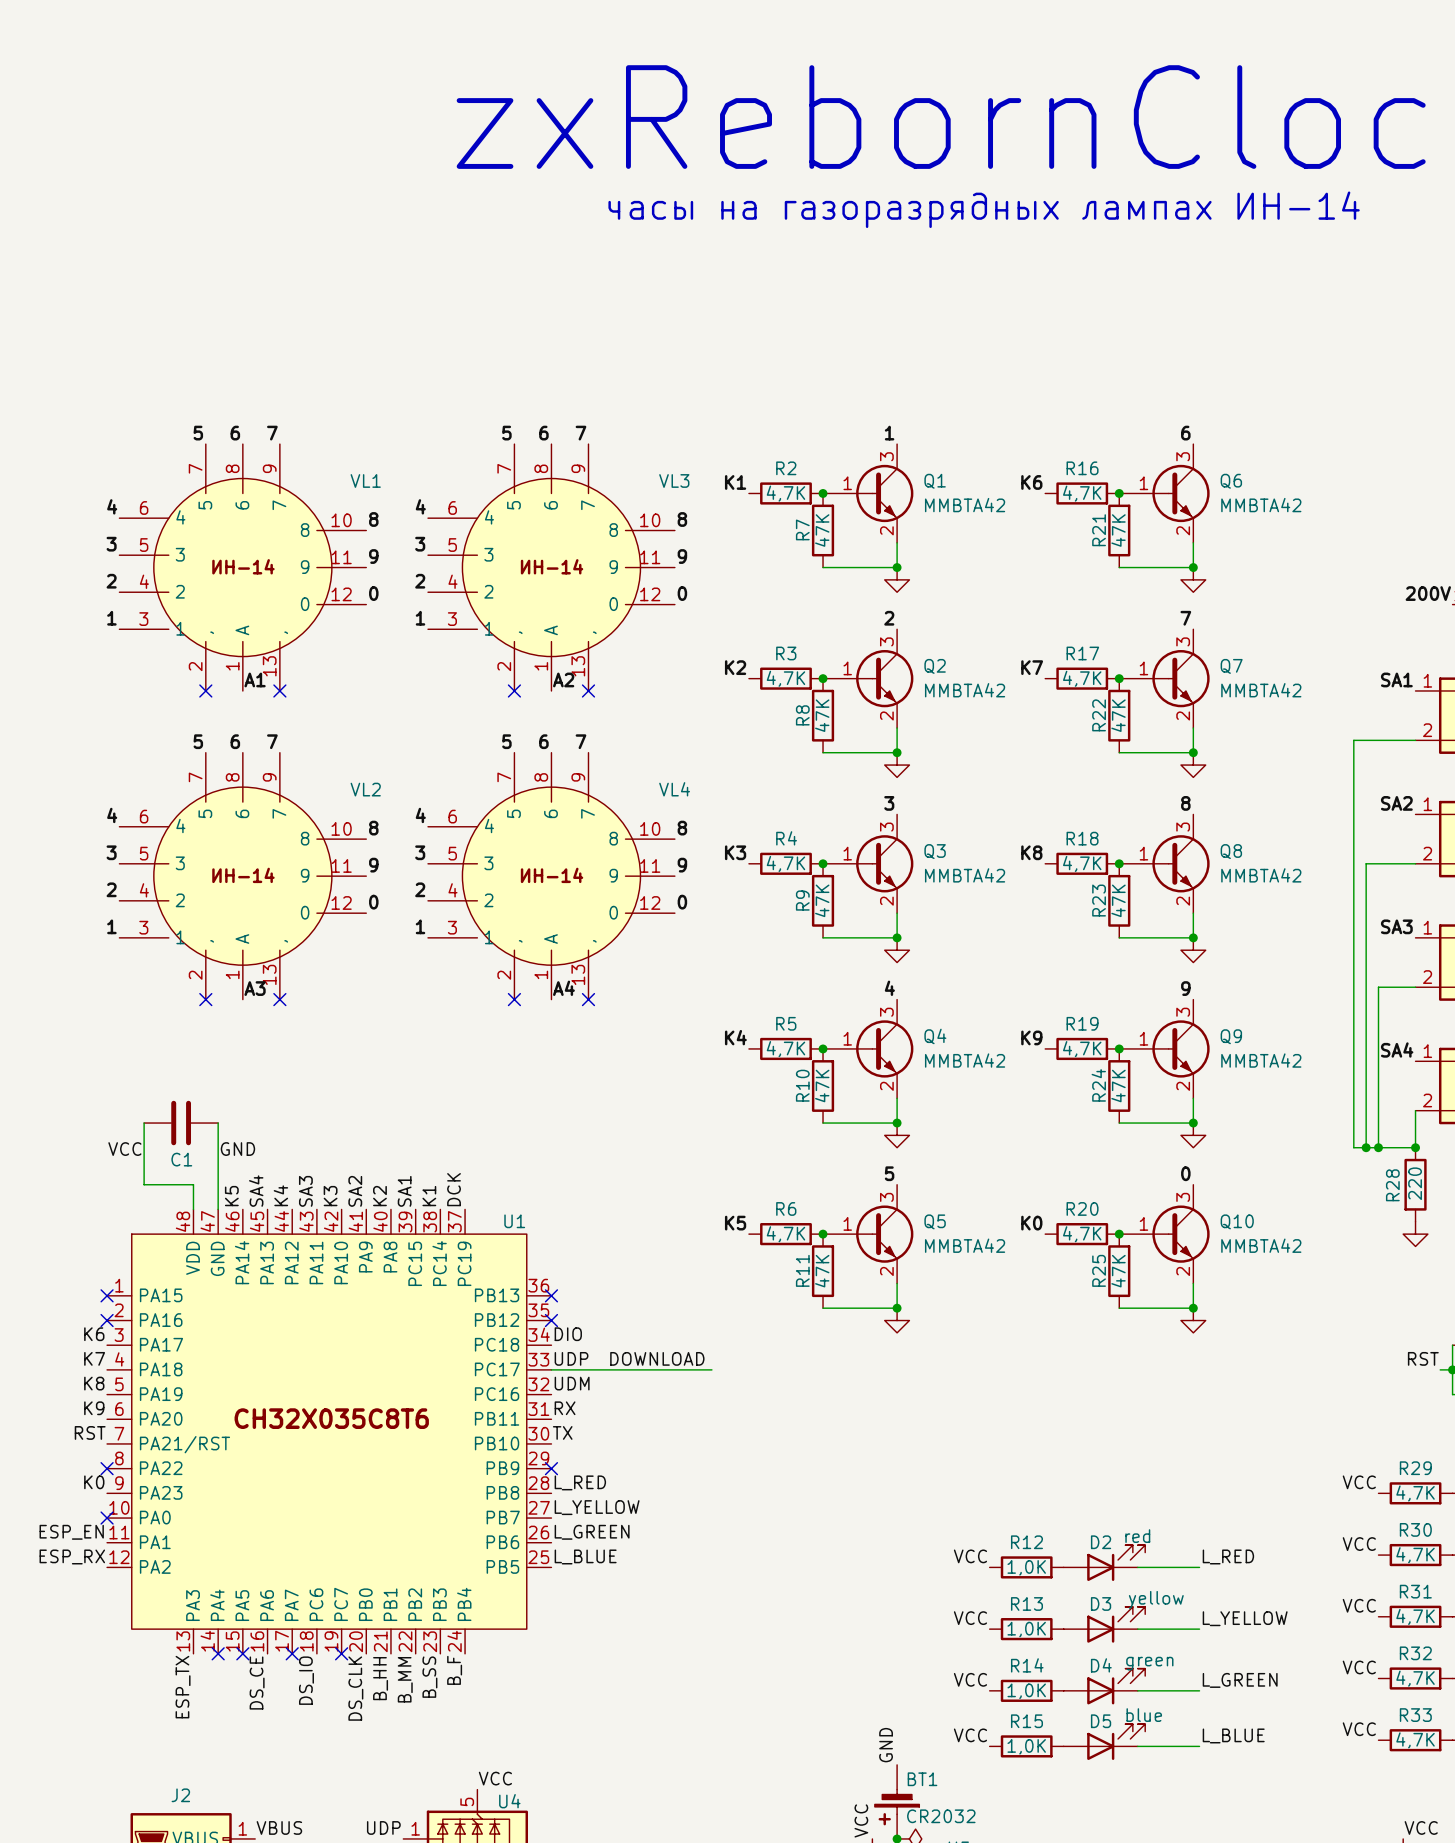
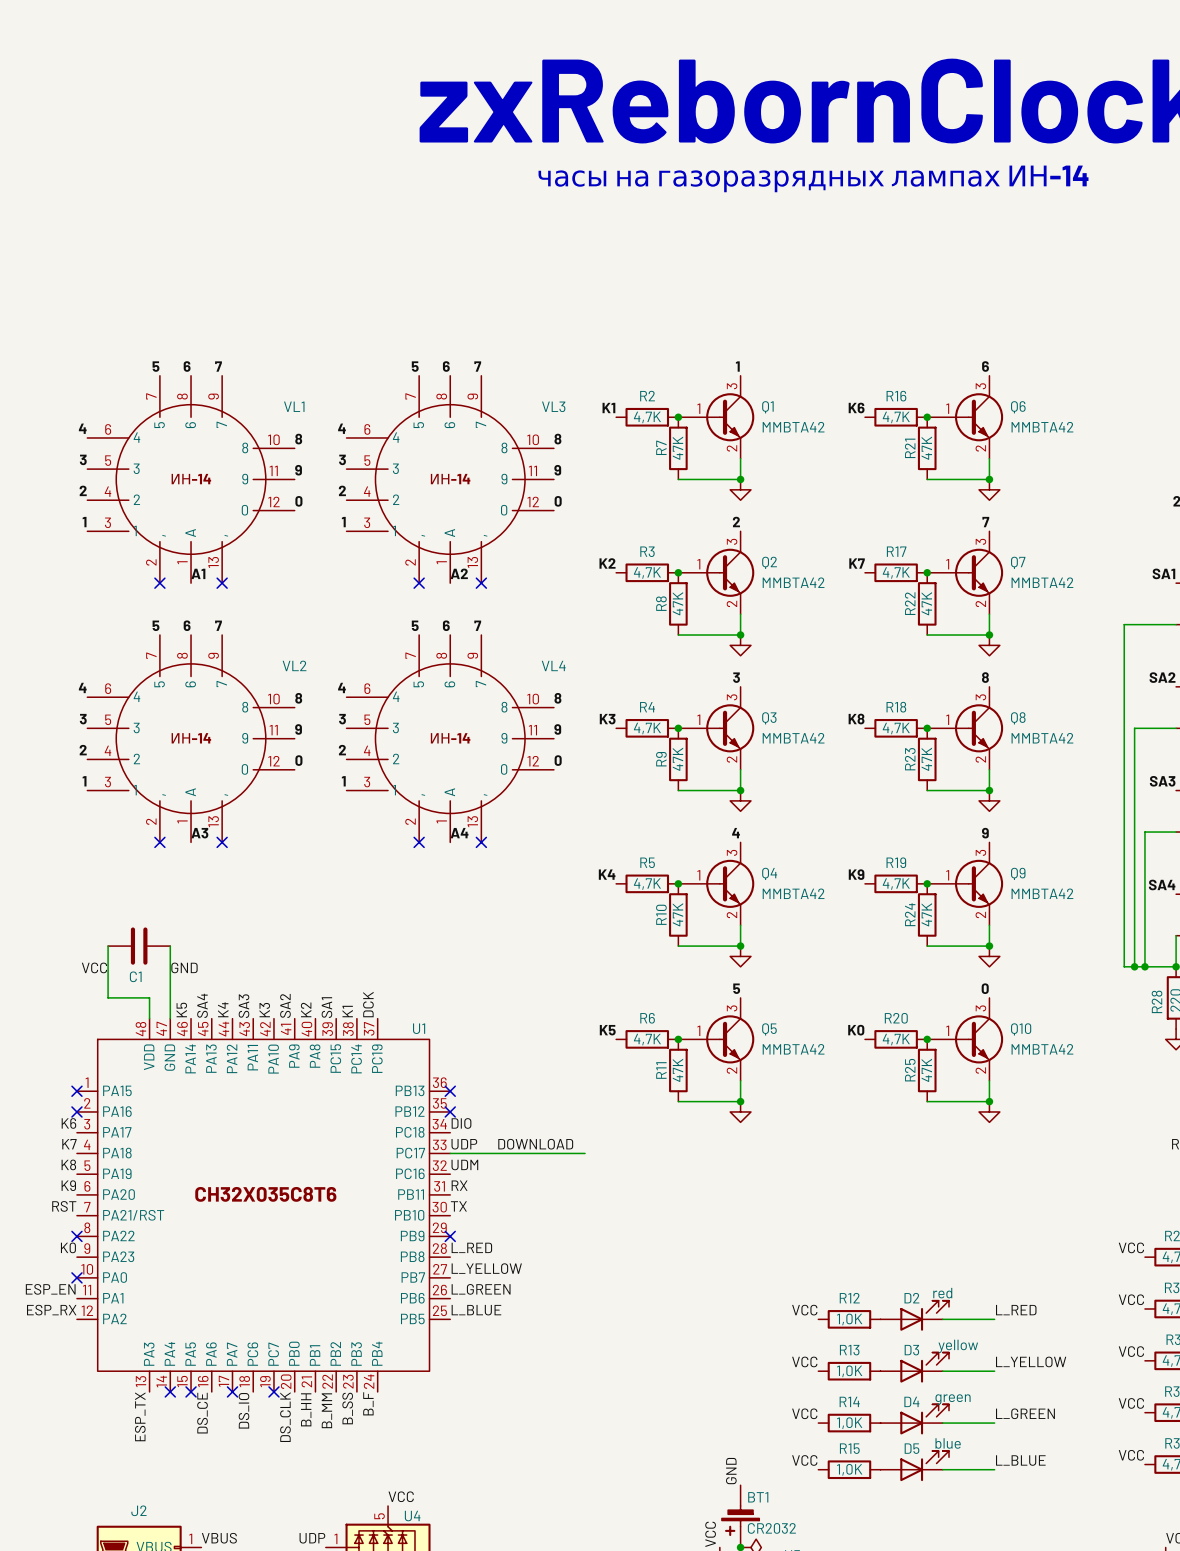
VL1 symbol: [119, 444, 367, 691] -> [87, 375, 295, 584]
VL3 symbol: [428, 444, 675, 691] -> [346, 375, 554, 584]
VL2 symbol: [119, 752, 367, 1000] -> [87, 635, 295, 843]
VL4 symbol: [428, 752, 675, 1000] -> [346, 635, 554, 843]
U1 symbol: [107, 1209, 552, 1654] -> [76, 1018, 451, 1392]

